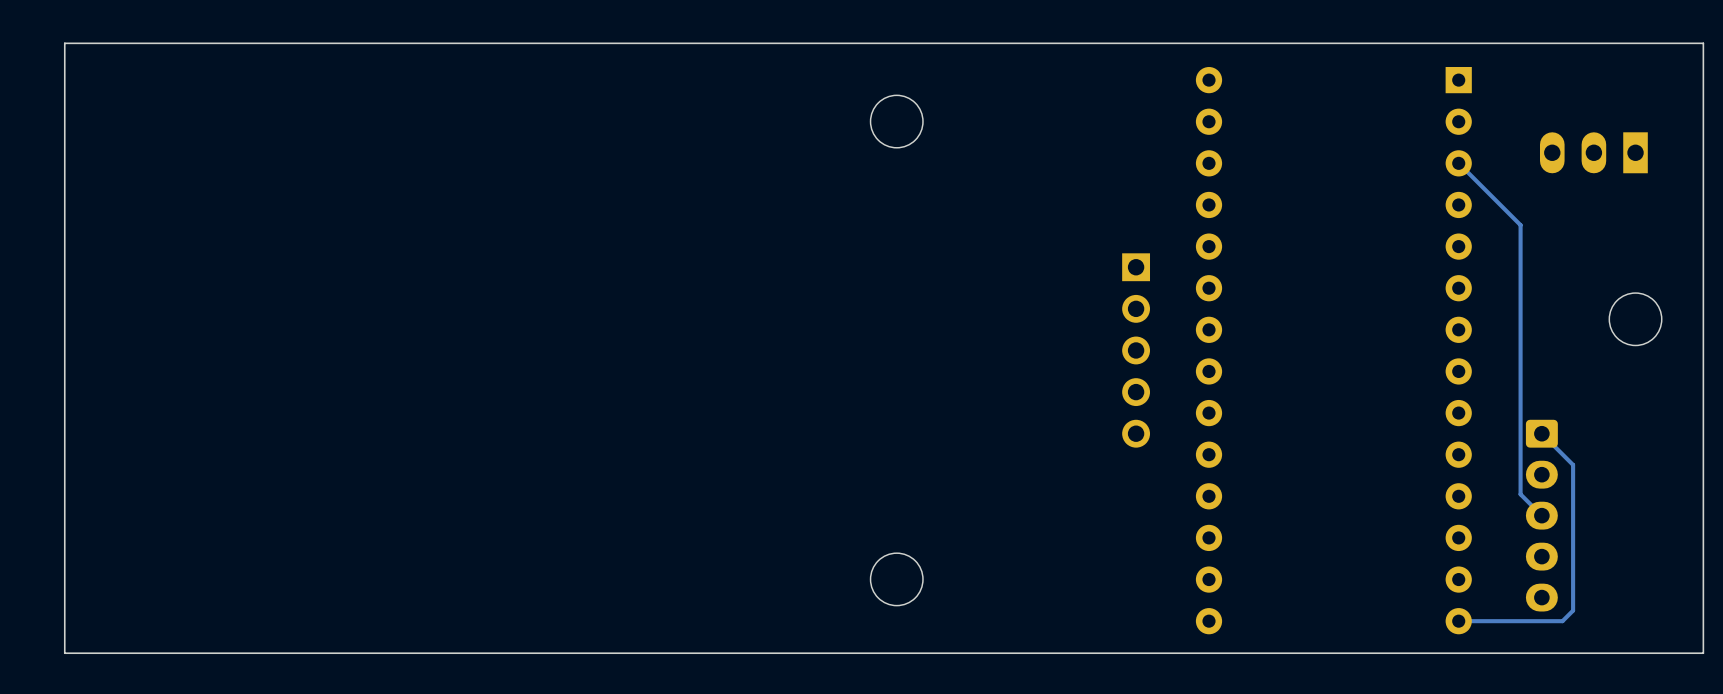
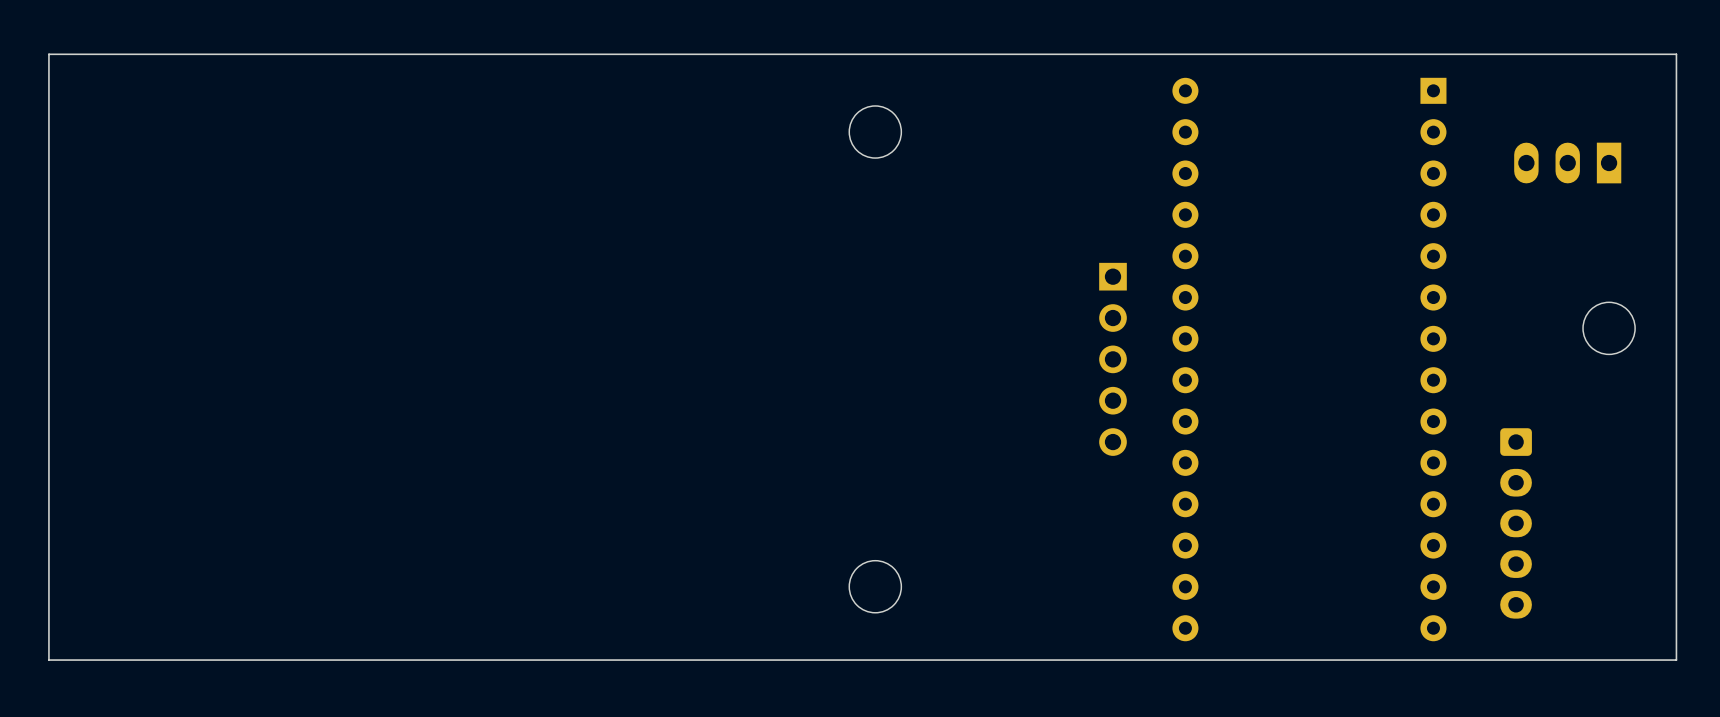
track: (1458, 163) (1520, 225) (1520, 494) (1541, 515) -> none
track: (1541, 433) (1573, 464) (1573, 610) (1562, 621) (1458, 621) -> none

